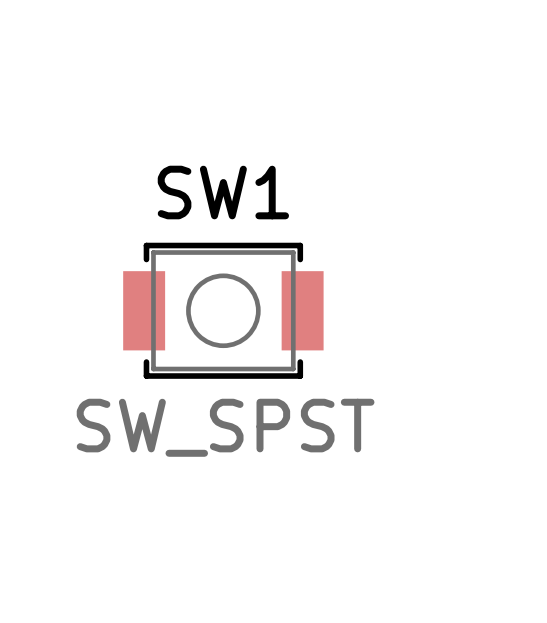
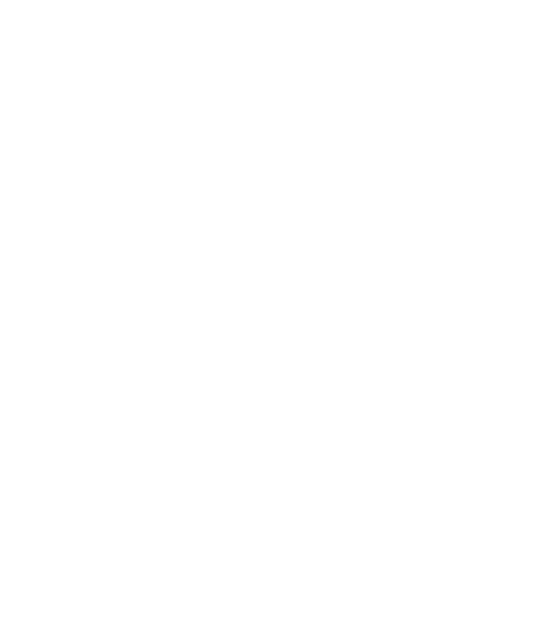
SW1: SW_SPST (223, 310) -> none

